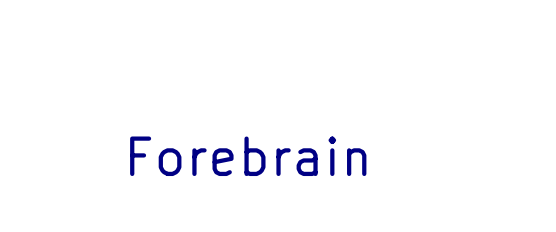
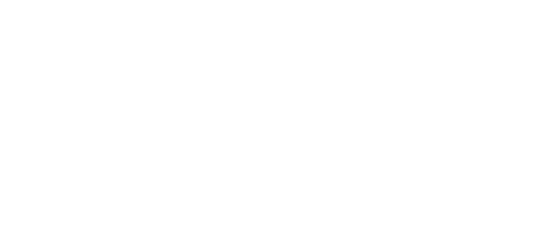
text: Forebrain (248, 156) -> none

